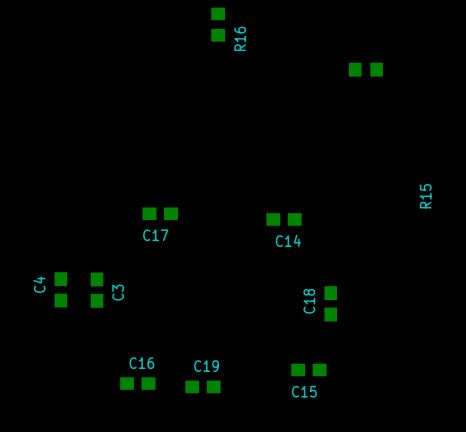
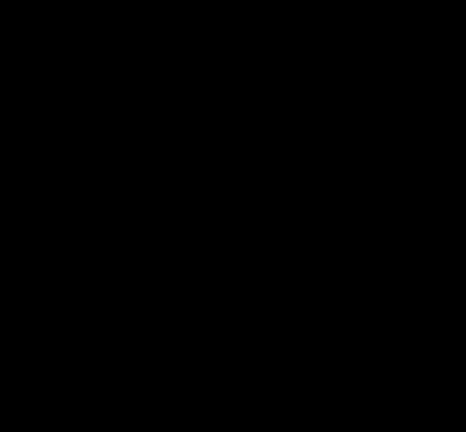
R16: (218, 24) -> none
R15: (365, 69) -> none
C17: (160, 213) -> none
C14: (284, 219) -> none
C3: (60, 289) -> none
C4: (96, 290) -> none
C18: (330, 303) -> none
C15: (308, 369) -> none
C16: (137, 383) -> none
C19: (202, 386) -> none

